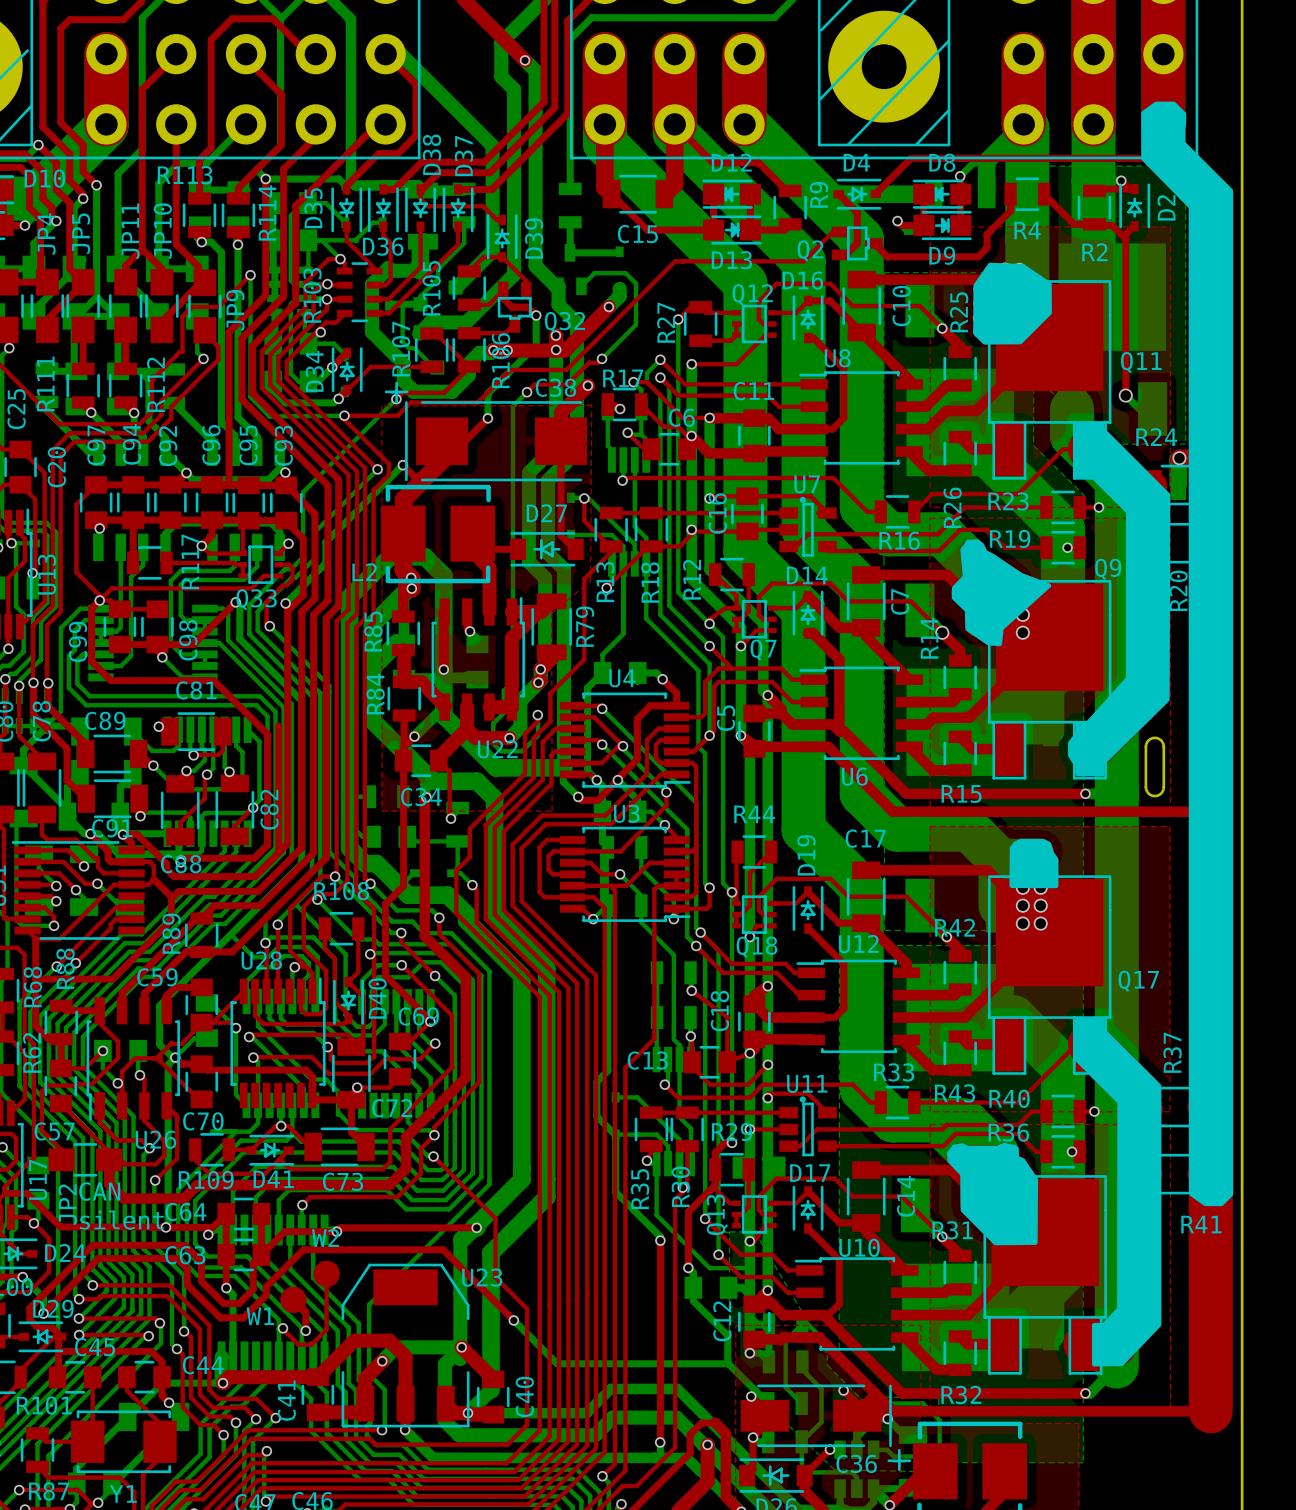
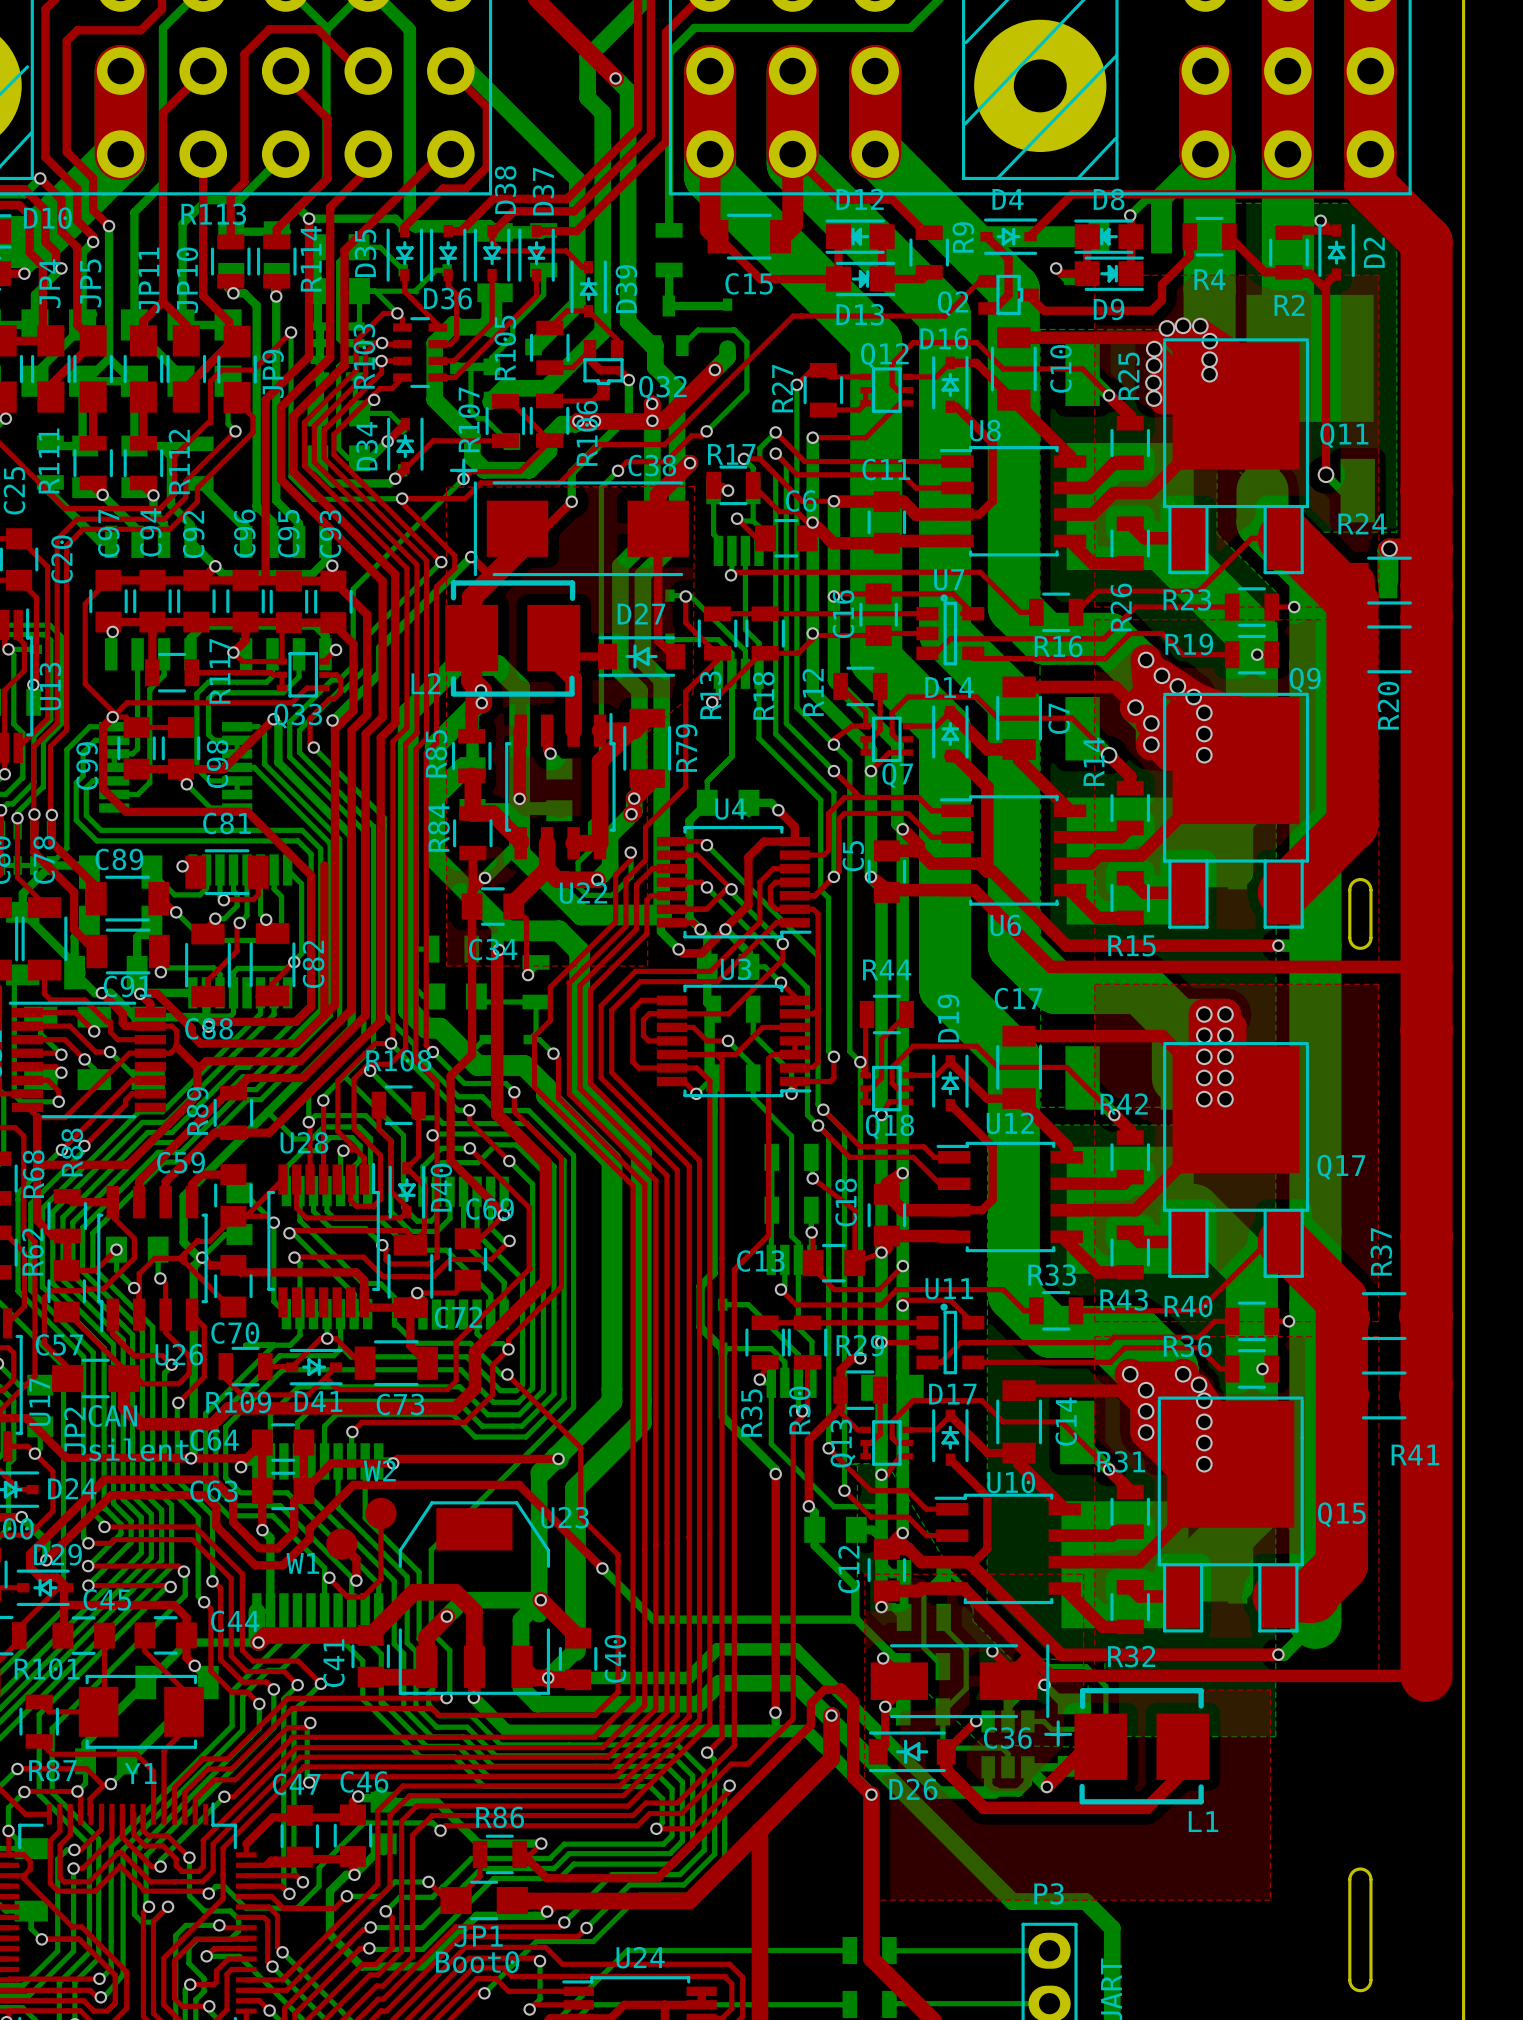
drawing: [951, 101, 1234, 1367] -> none
drawing: [973, 262, 1052, 345] -> none
drawing: [1009, 838, 1059, 889] -> none
drawing: [947, 1142, 1039, 1246] -> none

